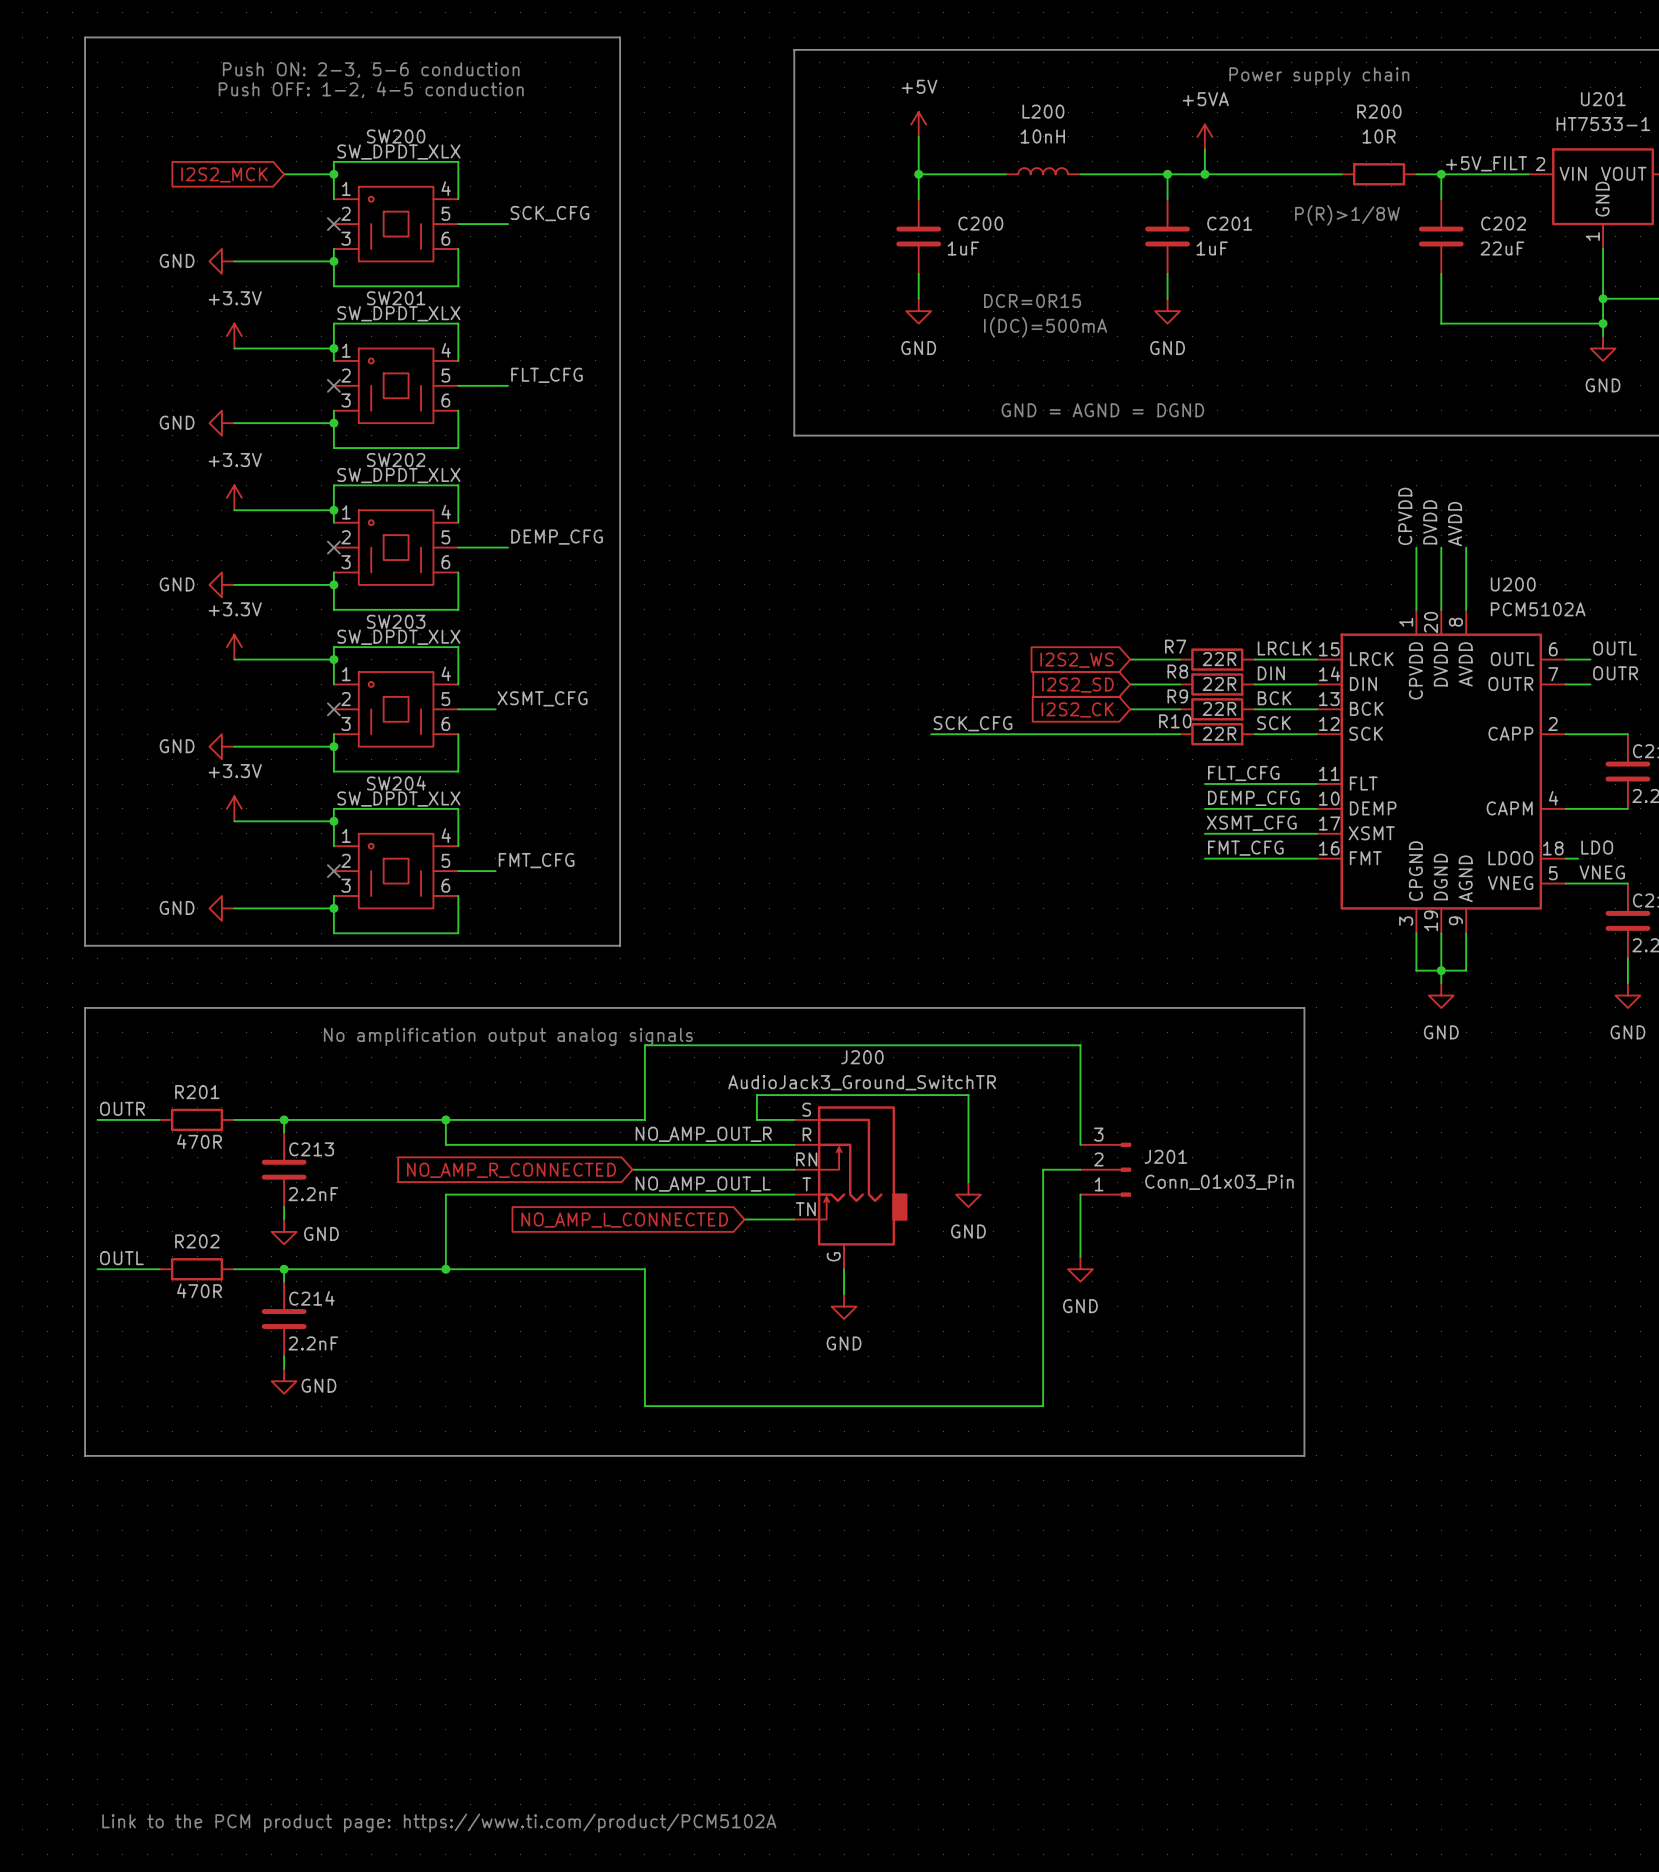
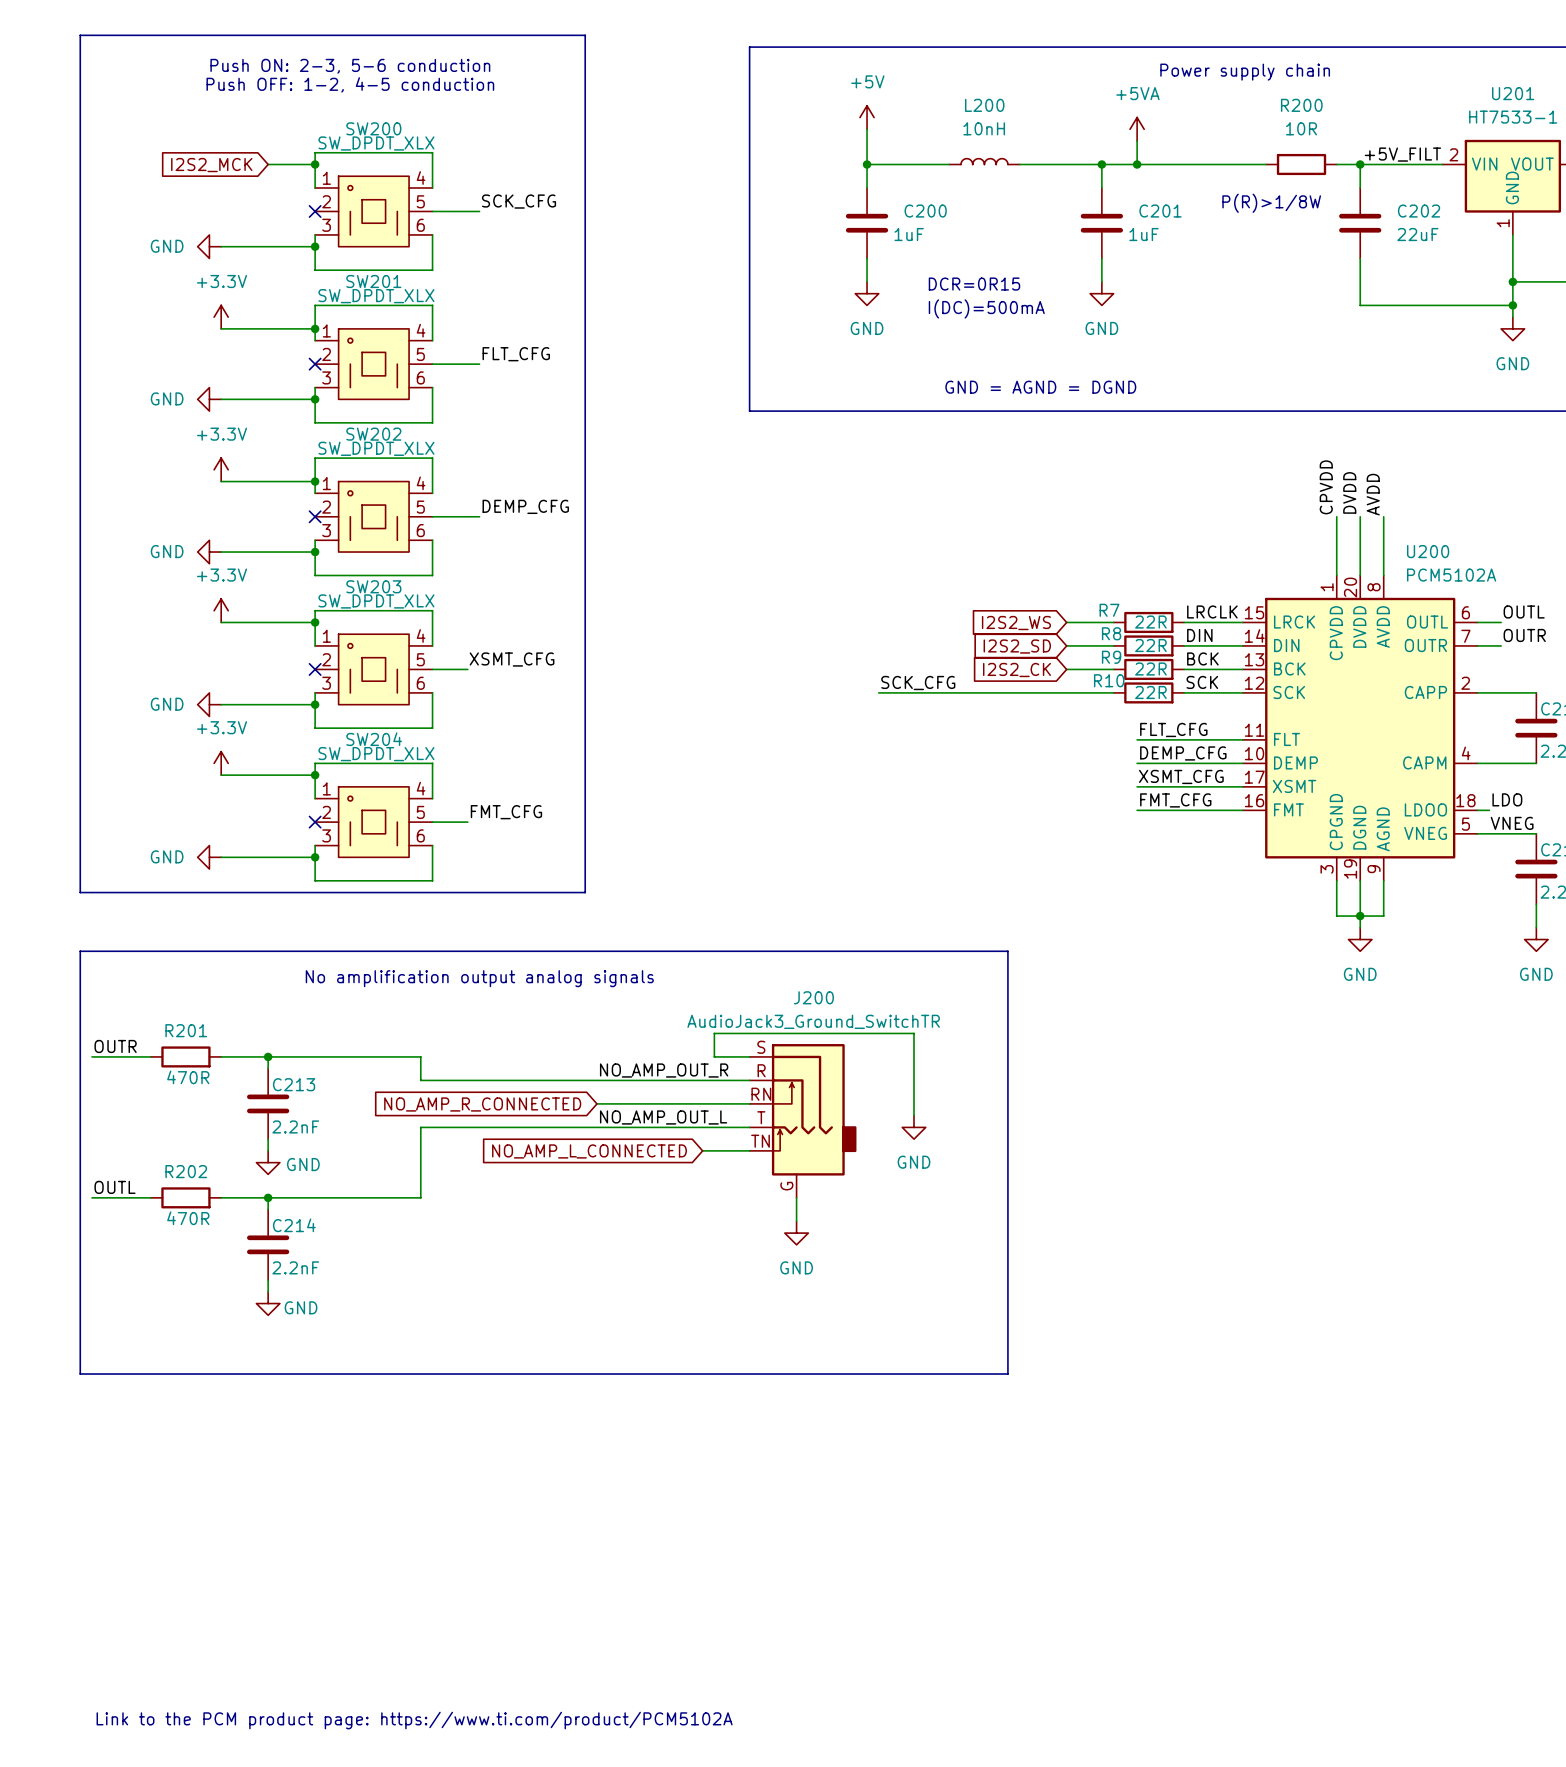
line: (1068, 1007) (1304, 1007) (1304, 1455) (1068, 1455) -> (1007, 951) (1007, 1374)
wire: (445, 1119) (644, 1119) (644, 1045) (1080, 1045) (1080, 1144) -> none
junction: (445, 1119) -> none
wire: (1080, 1169) (1043, 1169) (1043, 1406) (644, 1406) (644, 1269) (445, 1269) -> none
J201: Conn_01x03_Pin (1105, 1169) -> none
wire: (1080, 1194) (1080, 1256) -> none
junction: (445, 1269) -> none
power symbol: GND (1080, 1269) -> none

